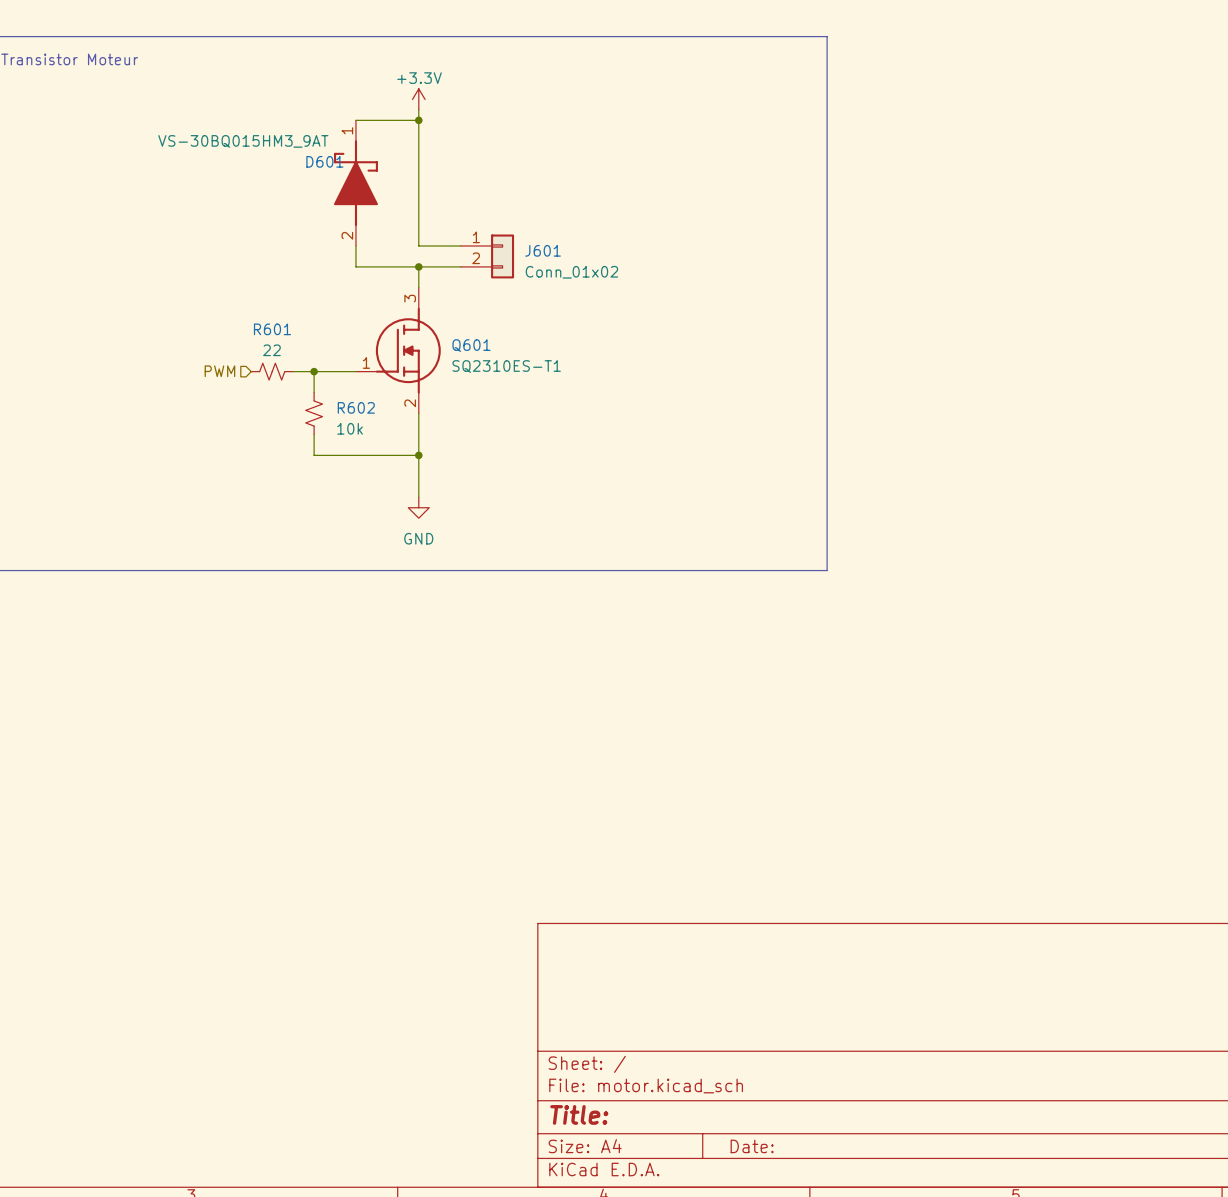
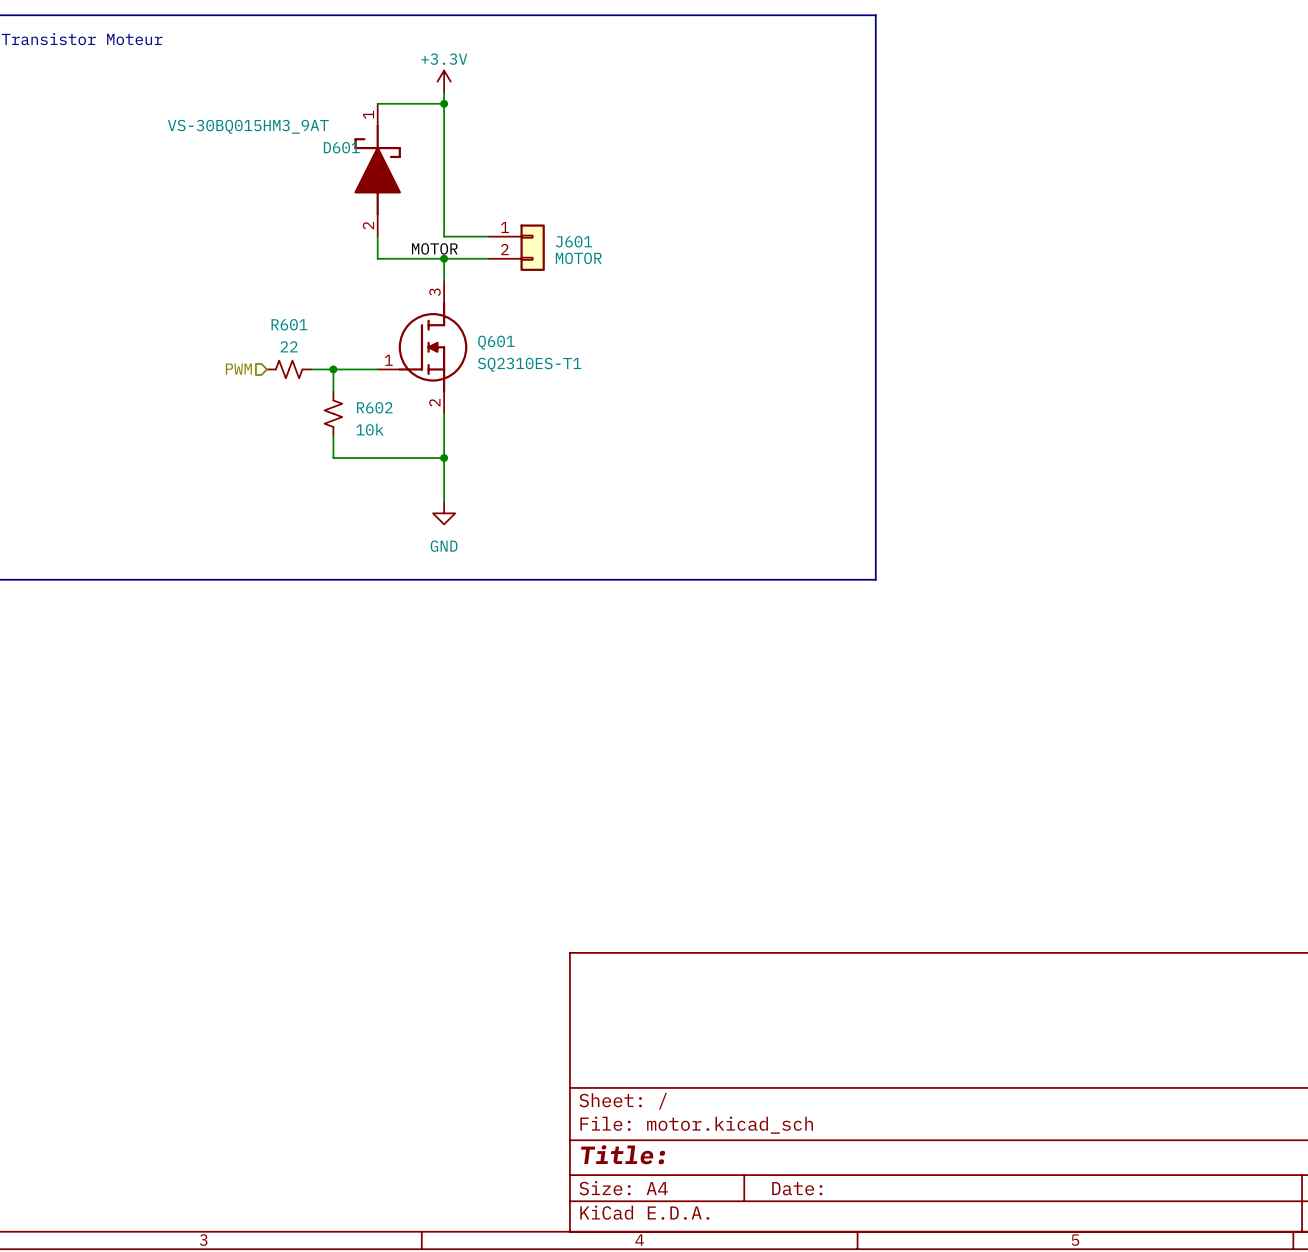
label: none -> MOTOR (434, 248)
J601 value: Conn_01x02 (571, 272) -> MOTOR (578, 258)

